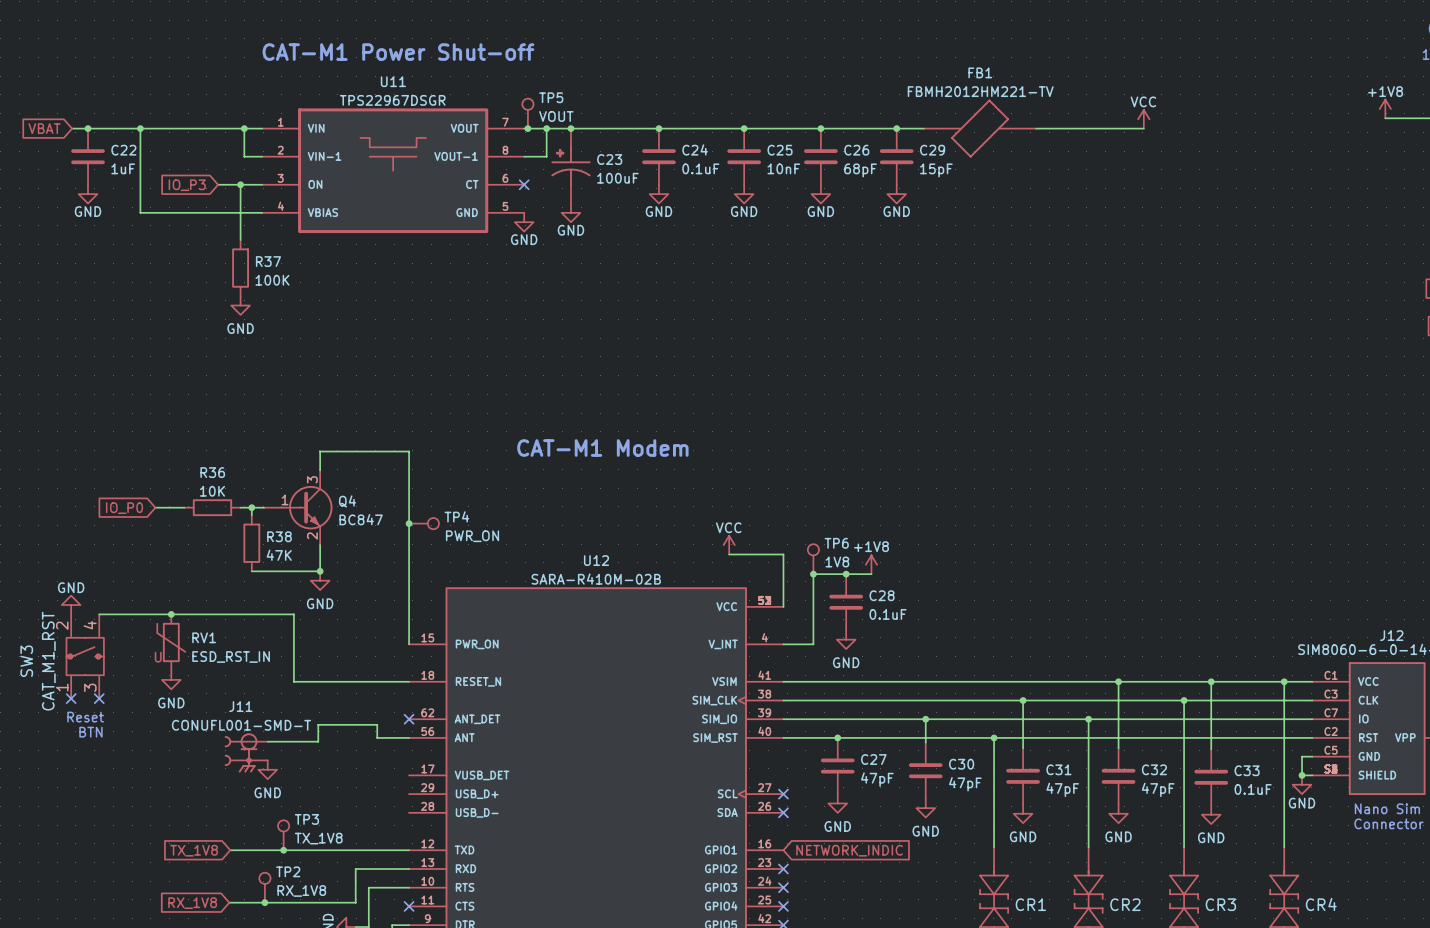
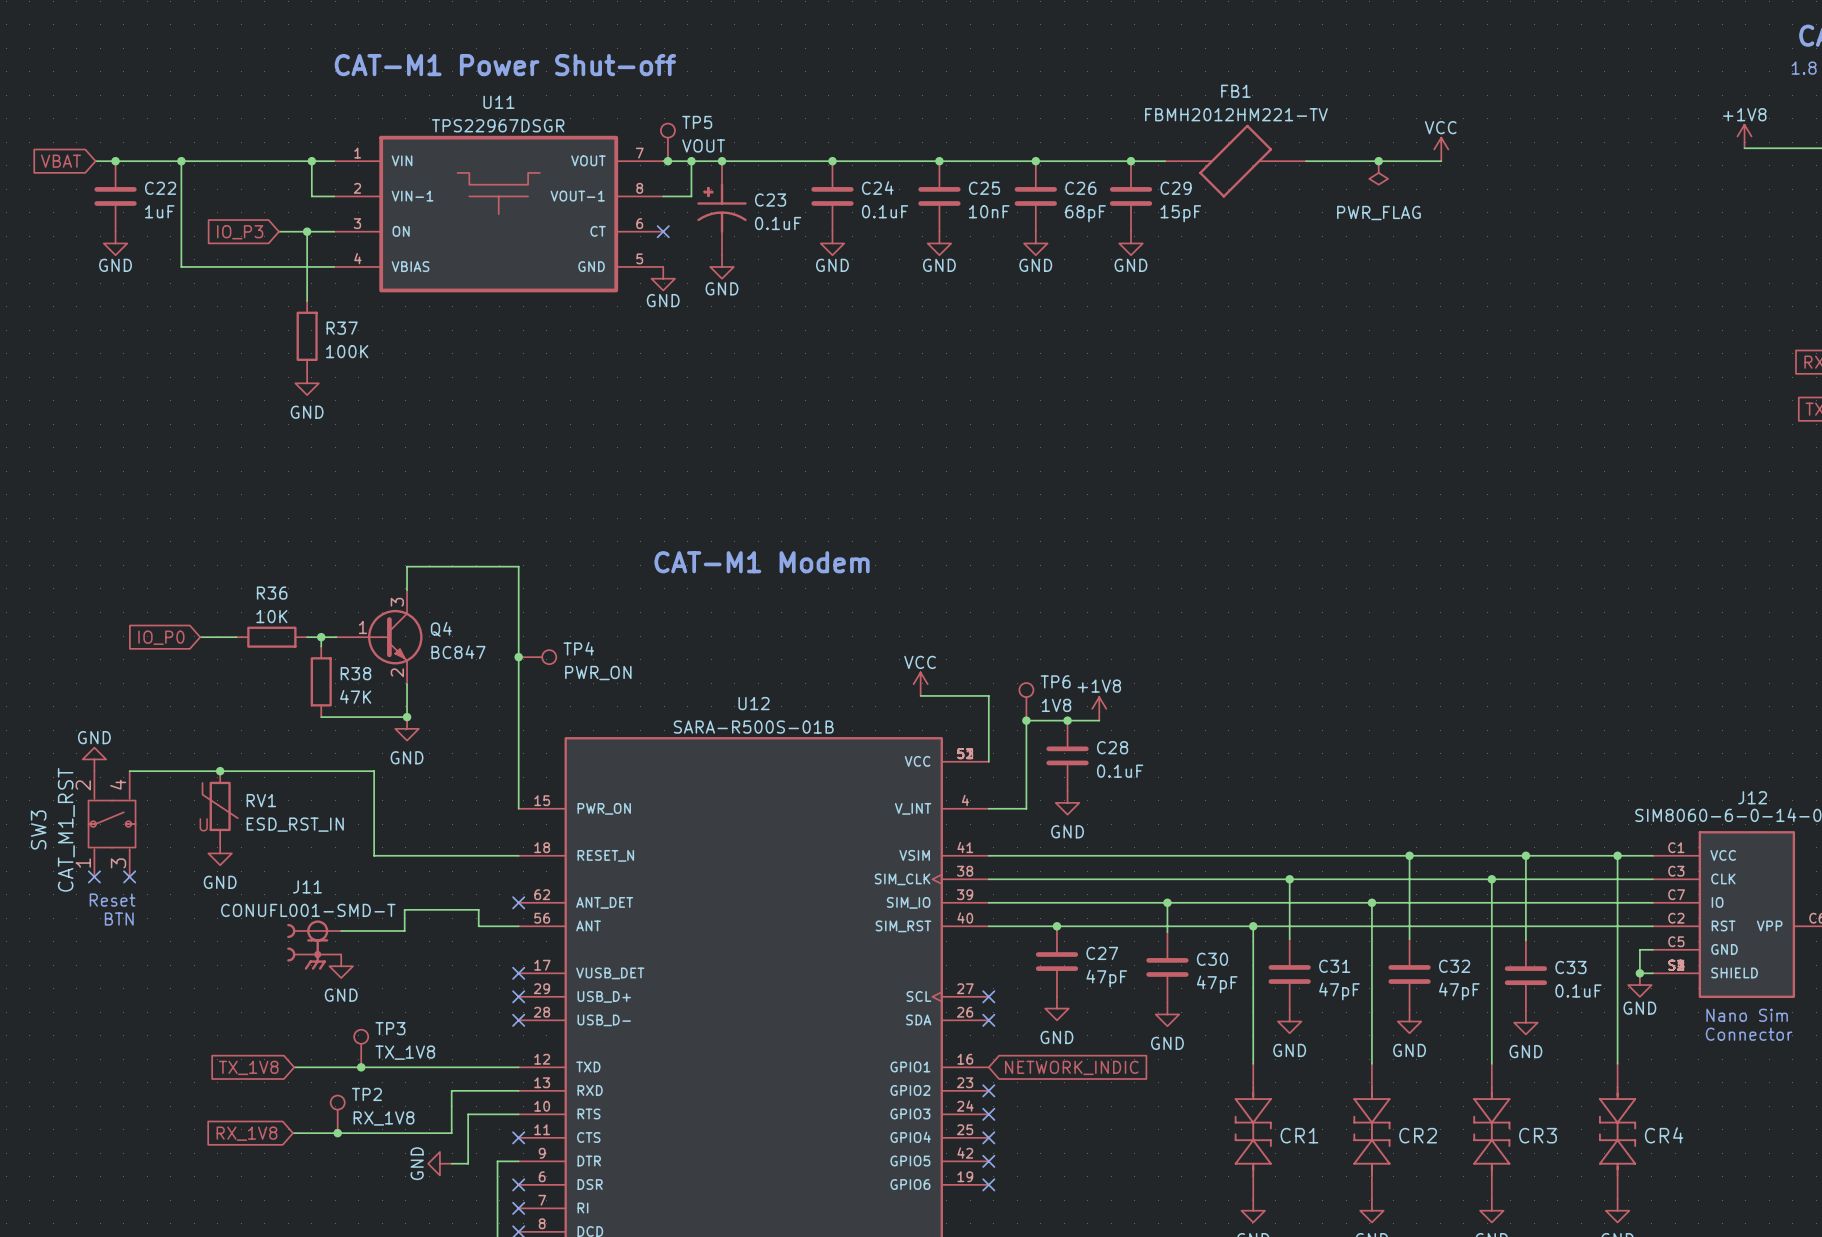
junction: none -> (1378, 161)
power symbol: none -> PWR_FLAG (1378, 172)
C23 value: 100uF (617, 178) -> 0.1uF (778, 223)
U12 value: SARA-R410M-02B (596, 579) -> SARA-R500S-01B (753, 727)
no-connect mark: none -> (518, 973)
no-connect mark: none -> (518, 996)
no-connect mark: none -> (518, 1020)

